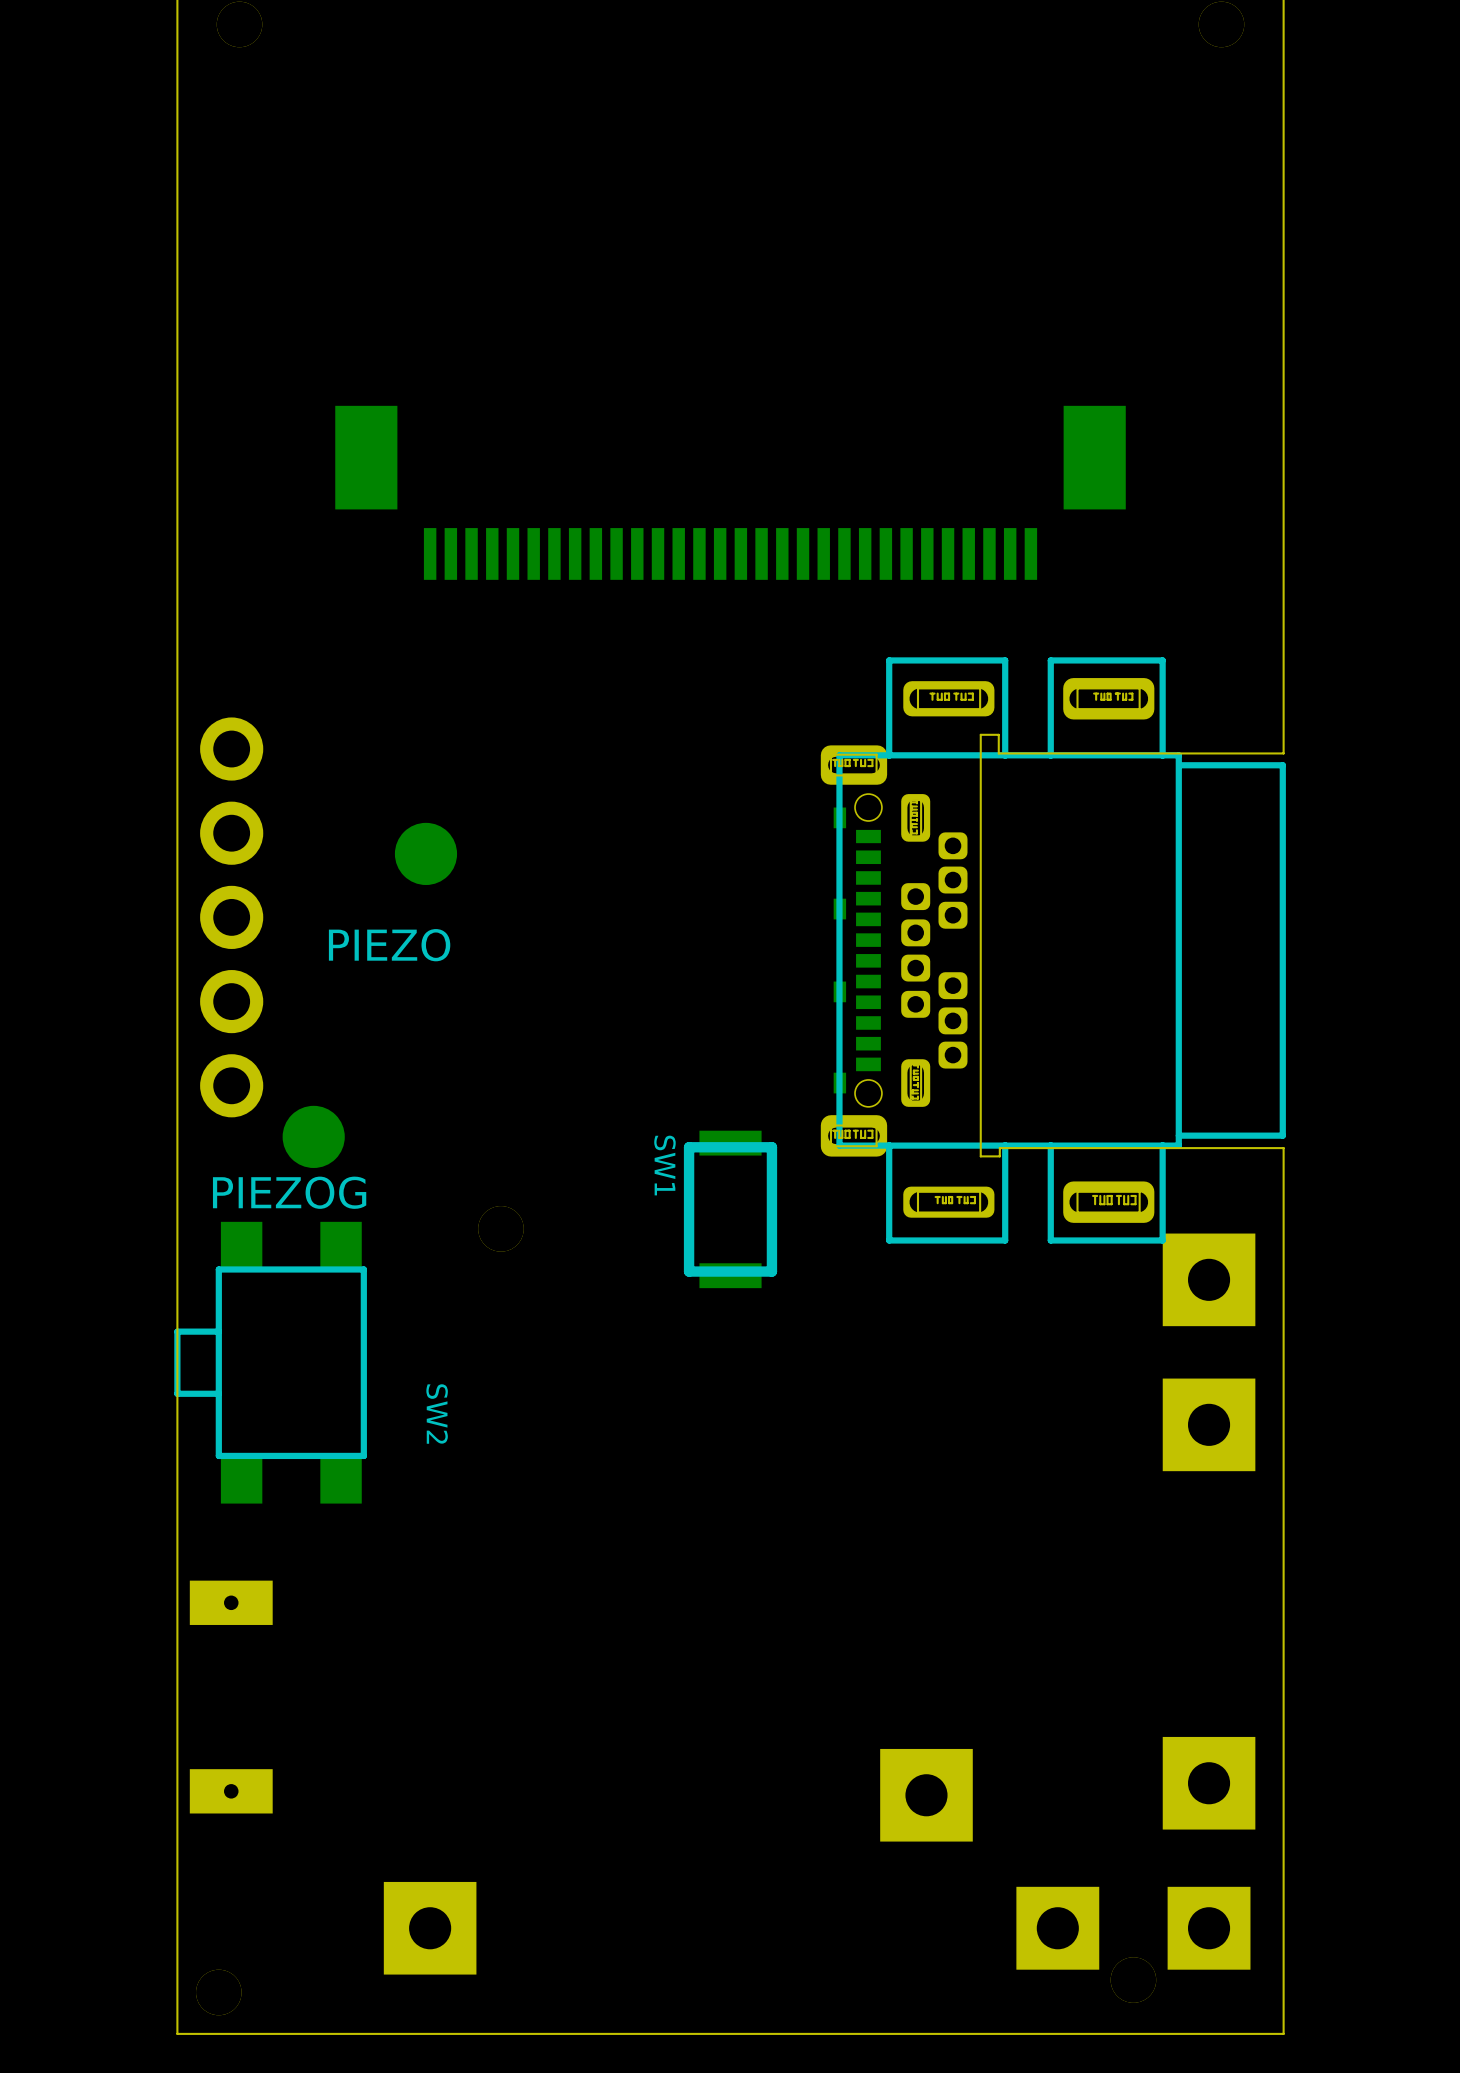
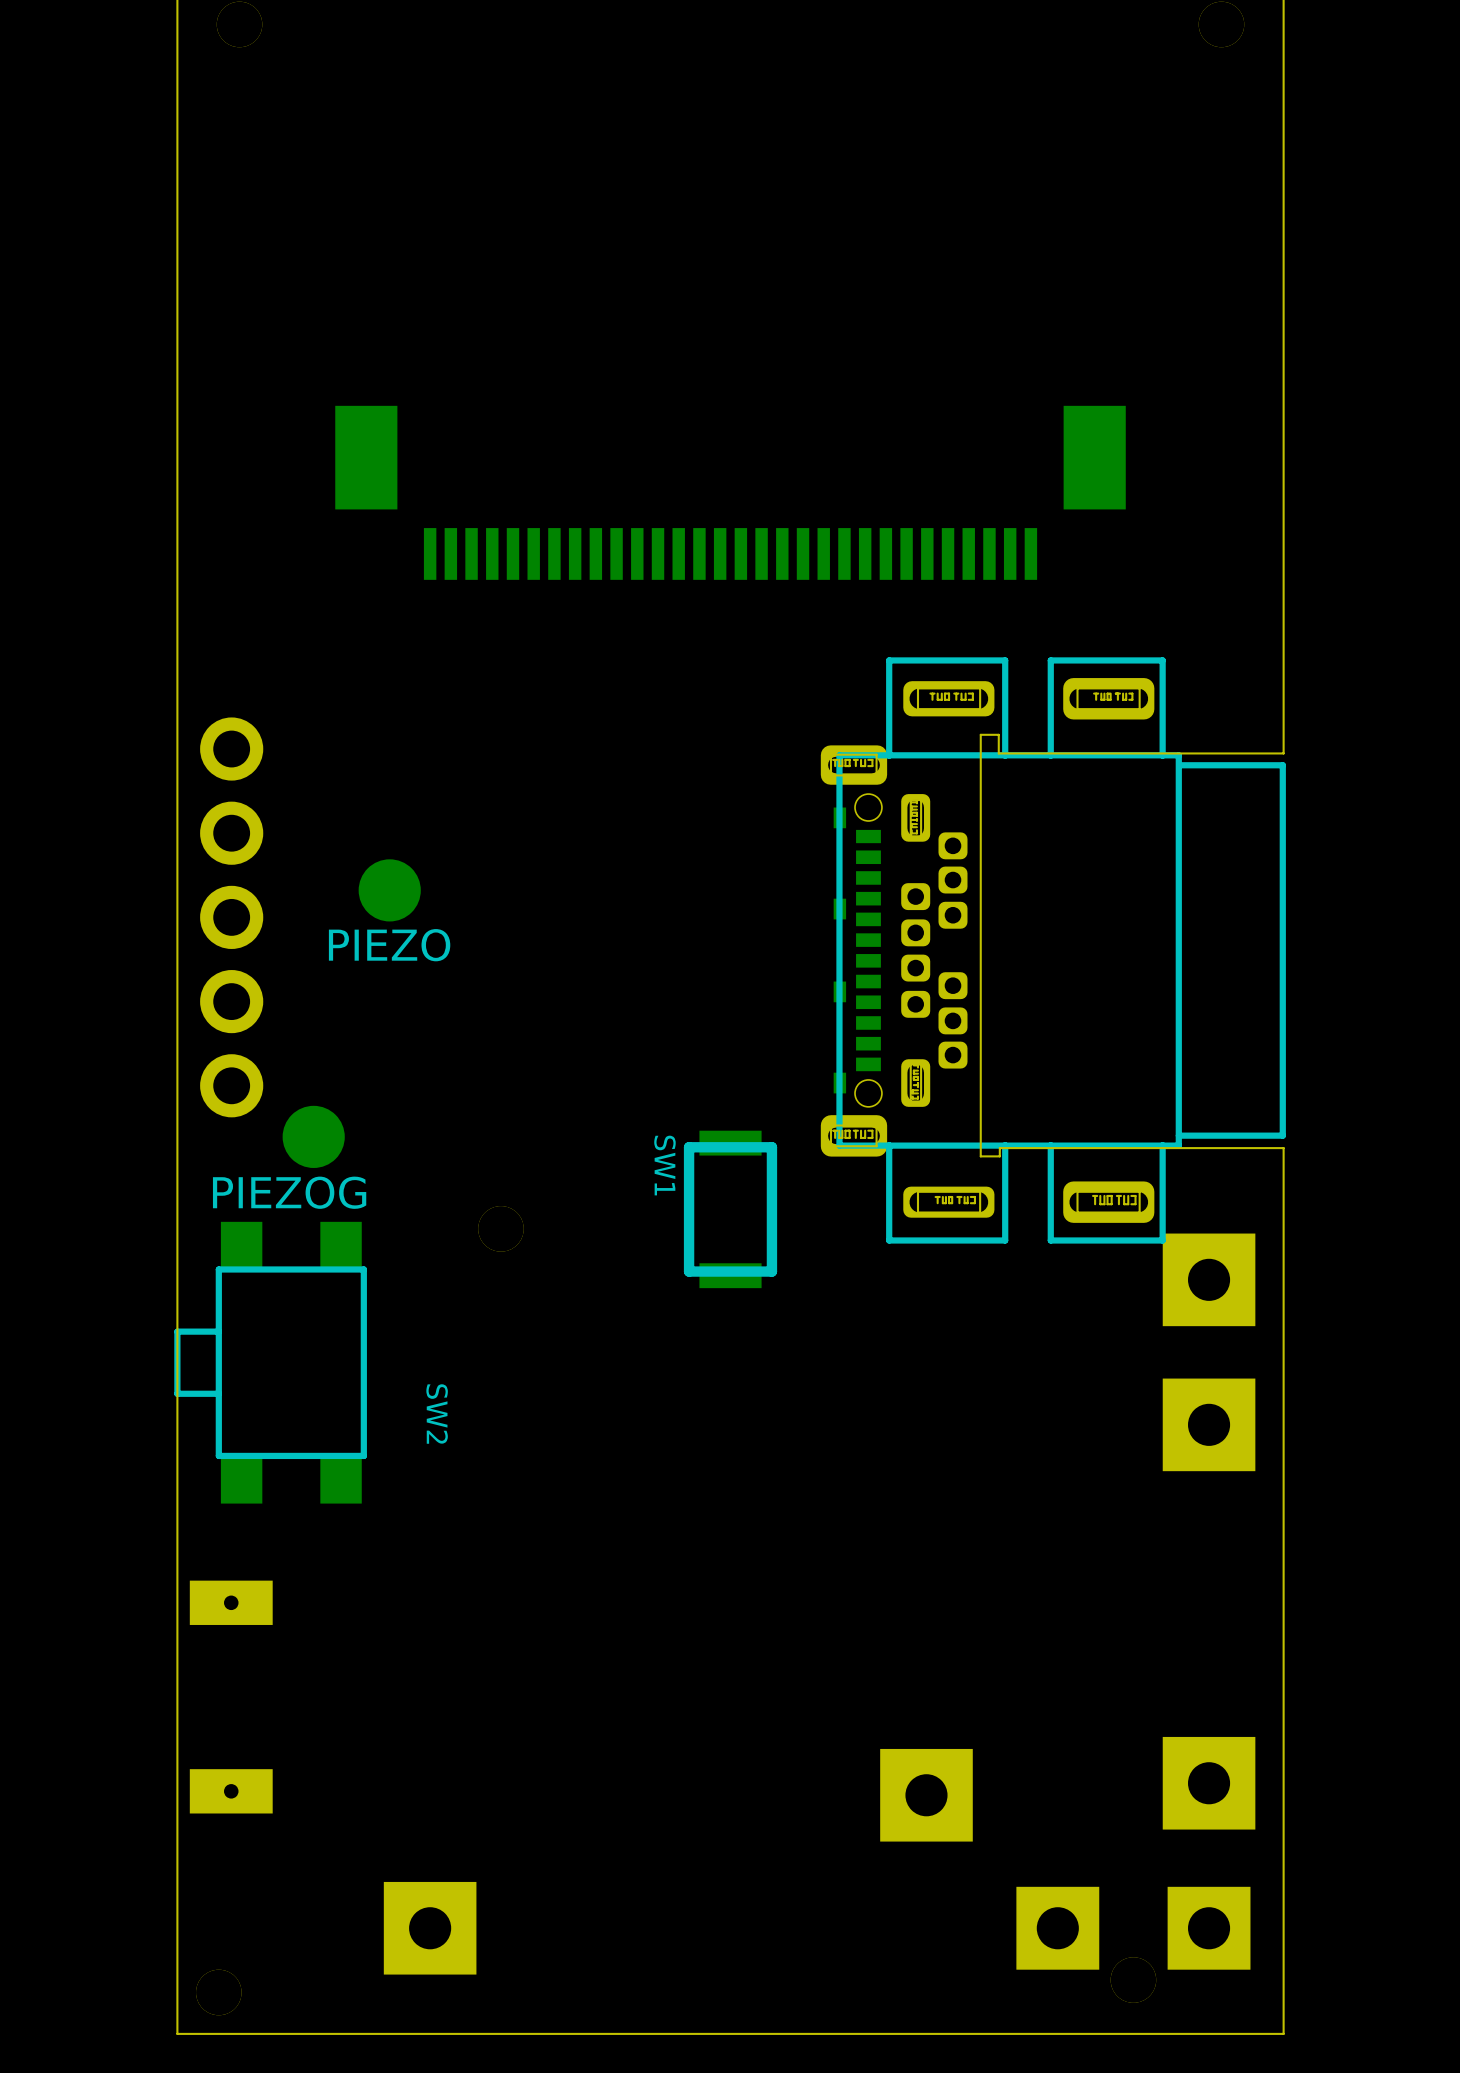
part position: (425, 853) -> (389, 890)

